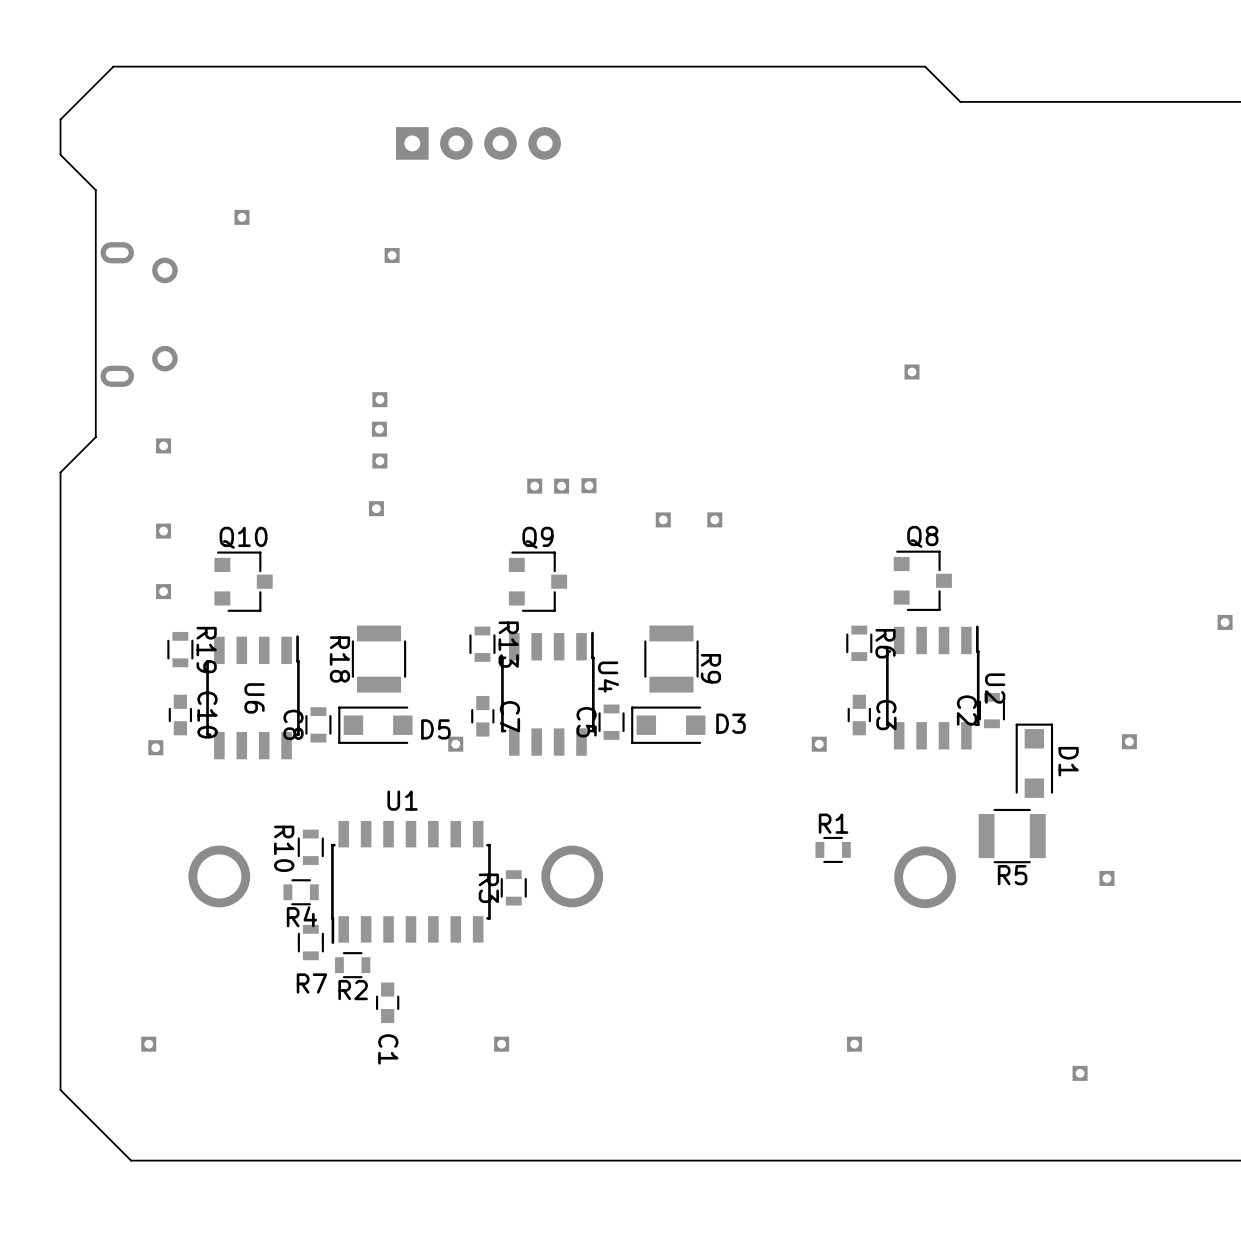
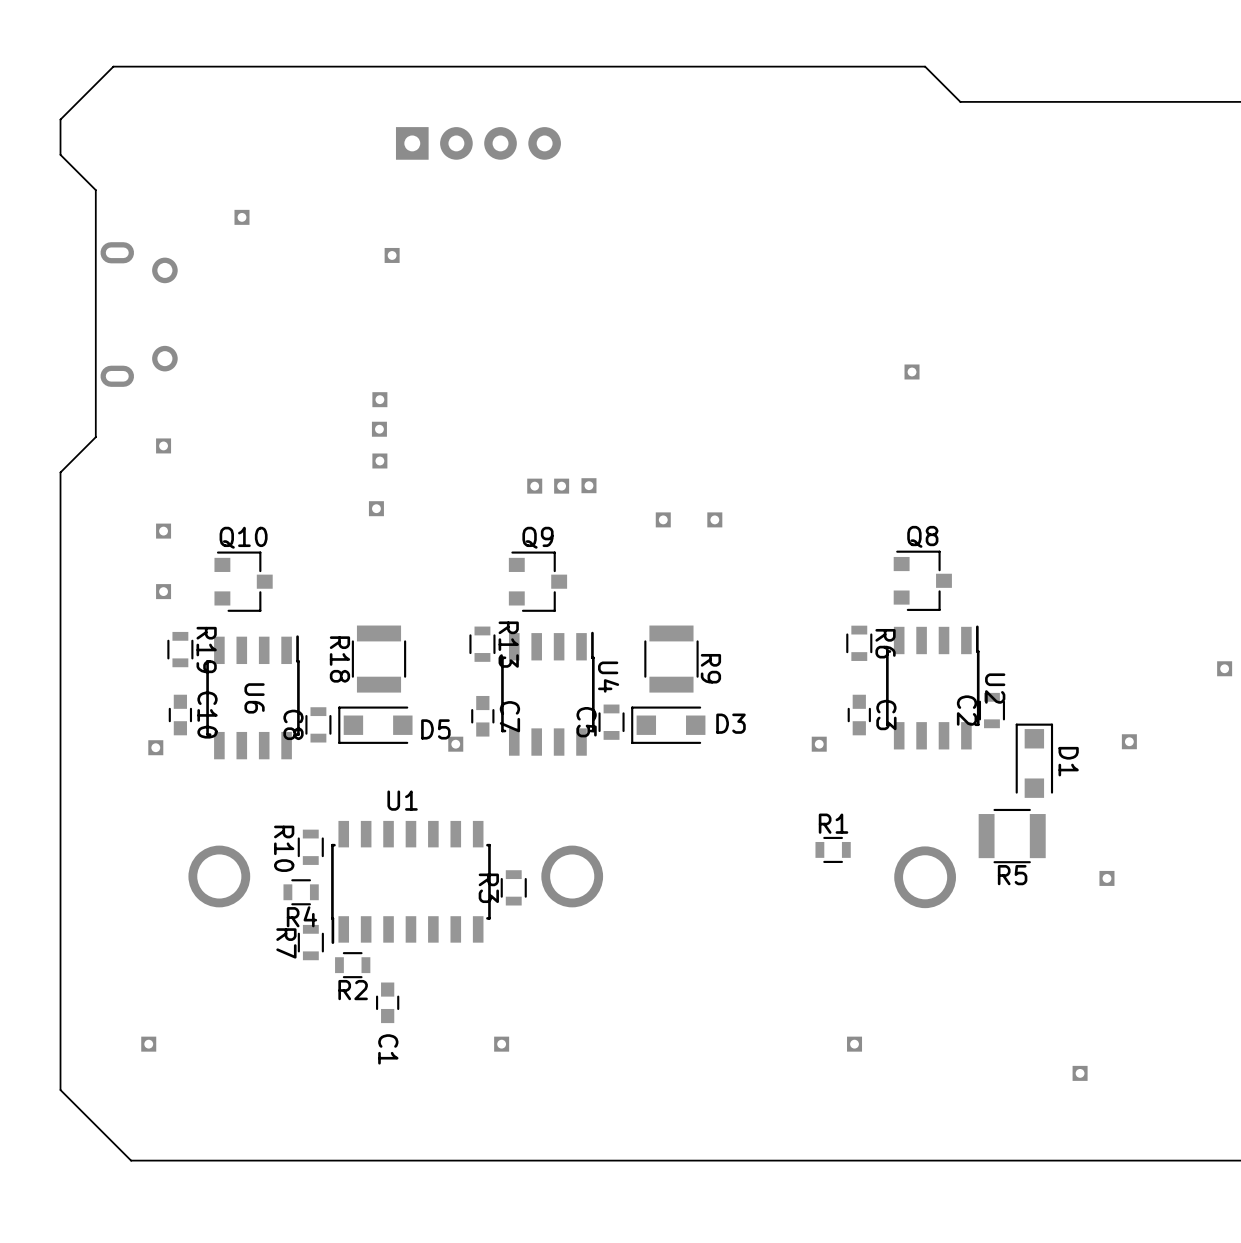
part position: (1225, 622) -> (1224, 668)
R7 name rotation: 0° (311, 983) -> 90° clockwise (286, 943)
R7 name position: R7 (311, 983) -> R7 (286, 943)

